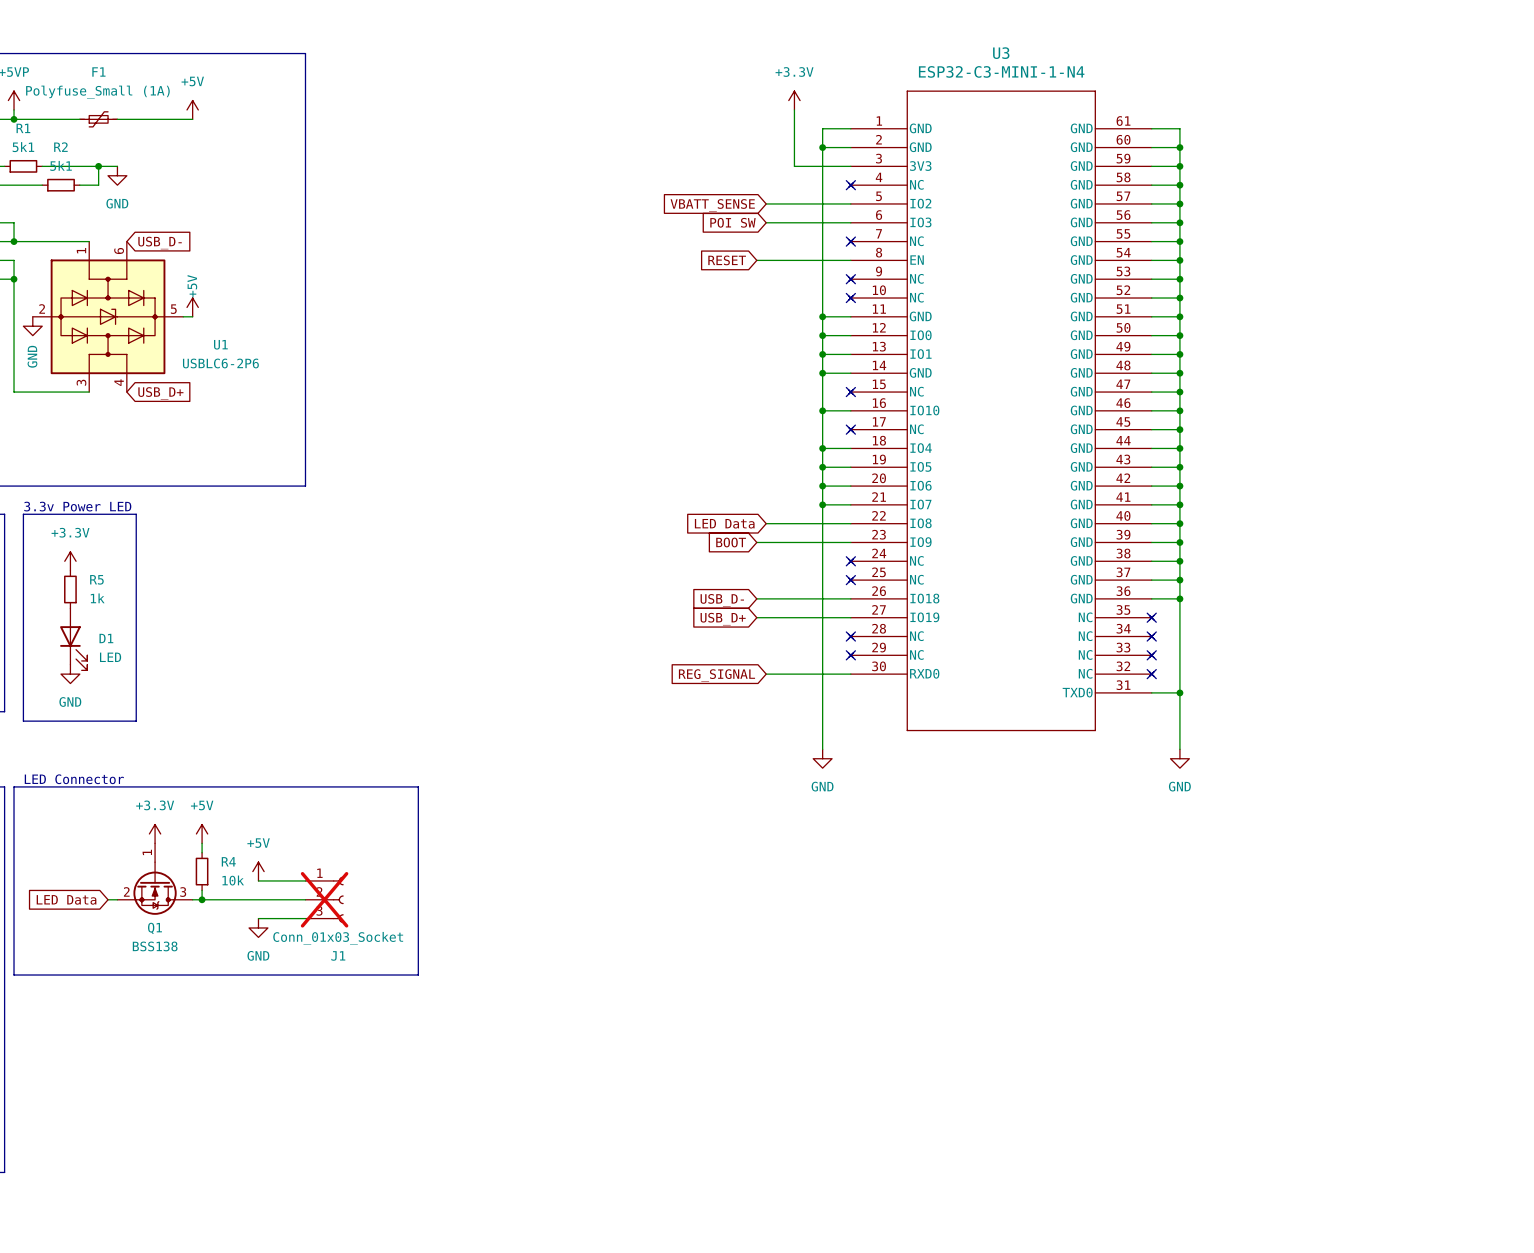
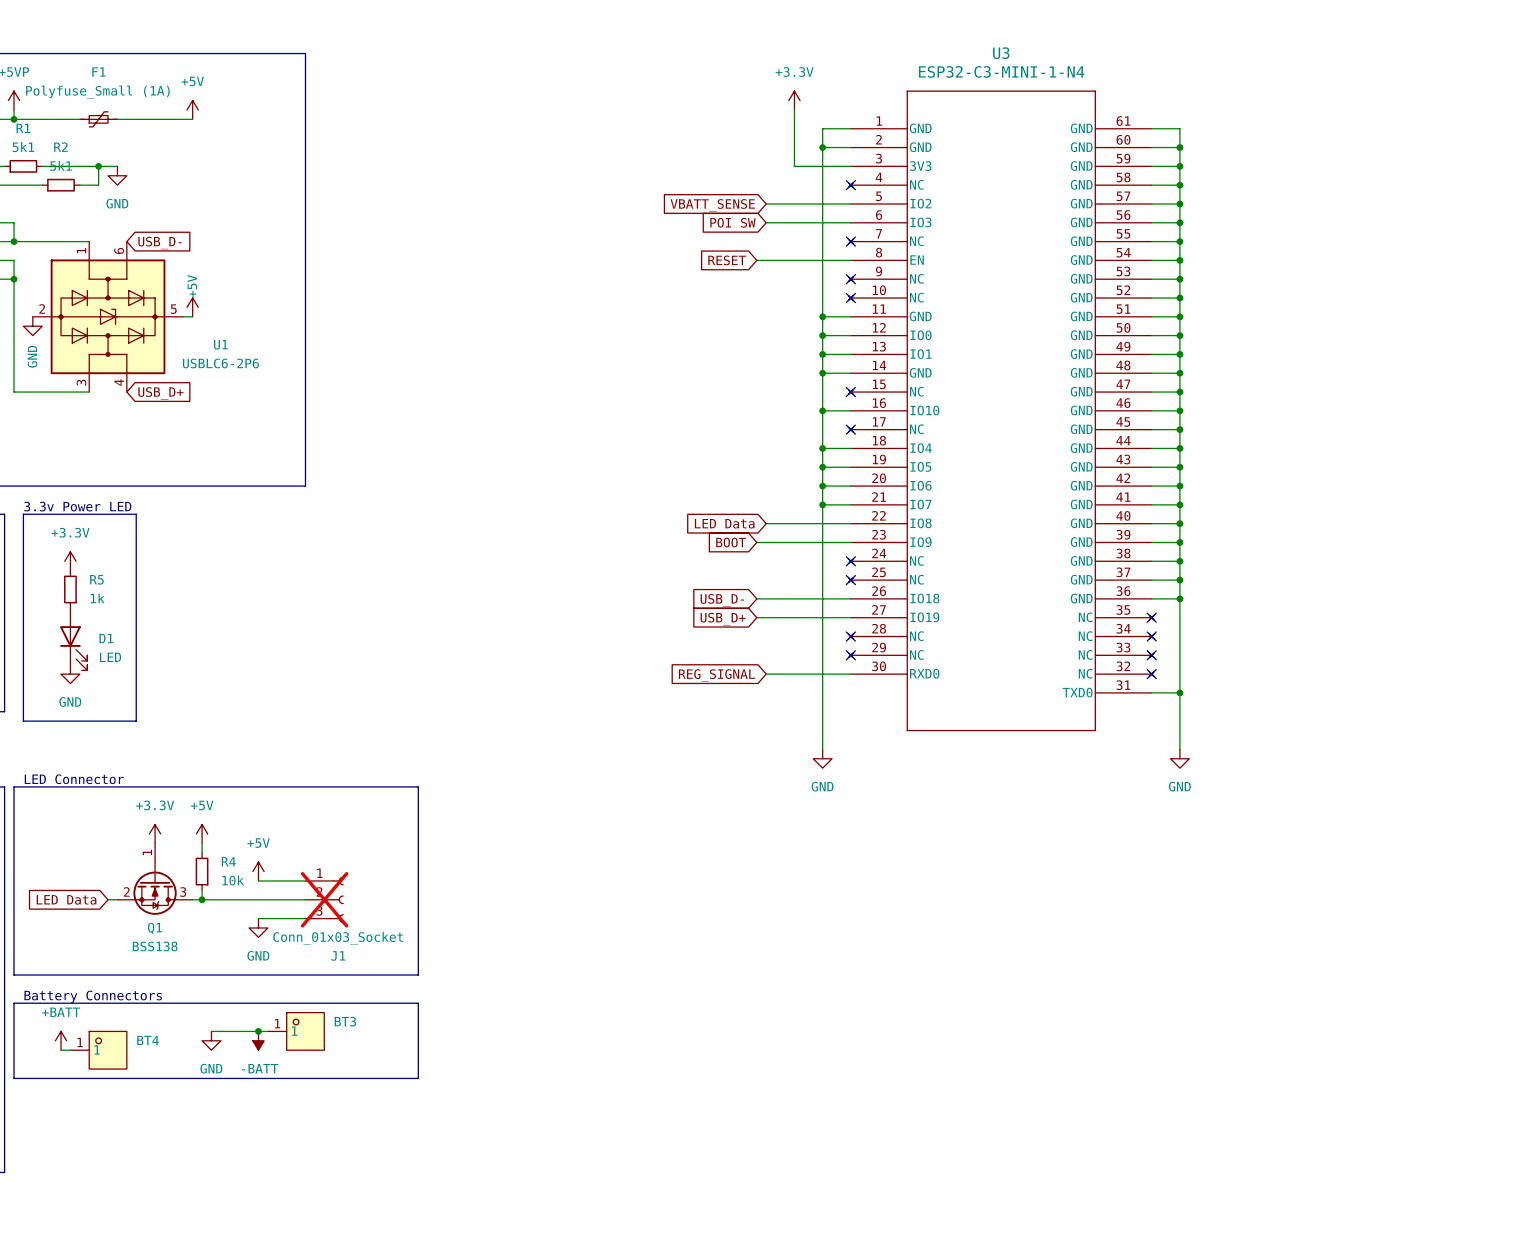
text: none -> Battery Connectors (93, 996)
line: none -> (14, 1003) (418, 1003) (418, 1078) (14, 1078) (14, 1003)
wire: none -> (211, 1031) (267, 1031)
junction: none -> (258, 1031)
BT3: none -> (296, 1031)
power symbol: none -> +BATT (61, 1040)
power symbol: none -> GND (211, 1040)
power symbol: none -> -BATT (258, 1040)
wire: none -> (61, 1050) (70, 1050)
BT4: none -> (98, 1050)

